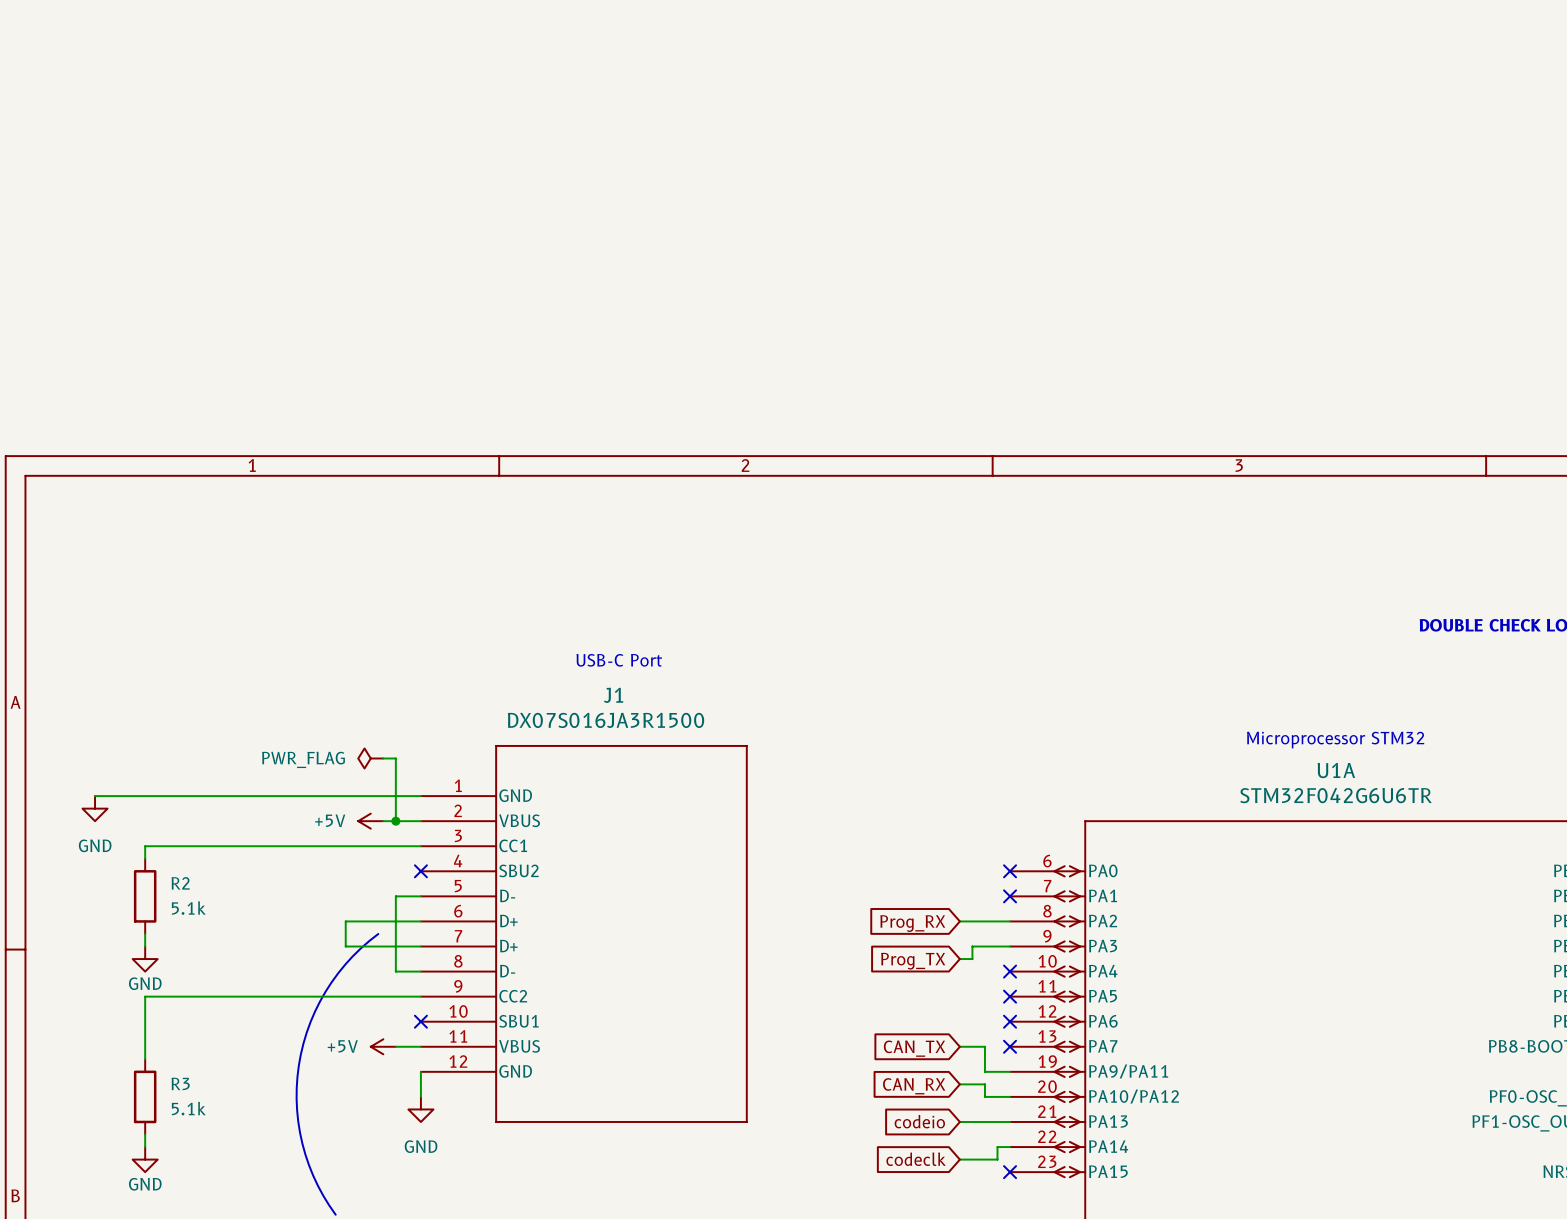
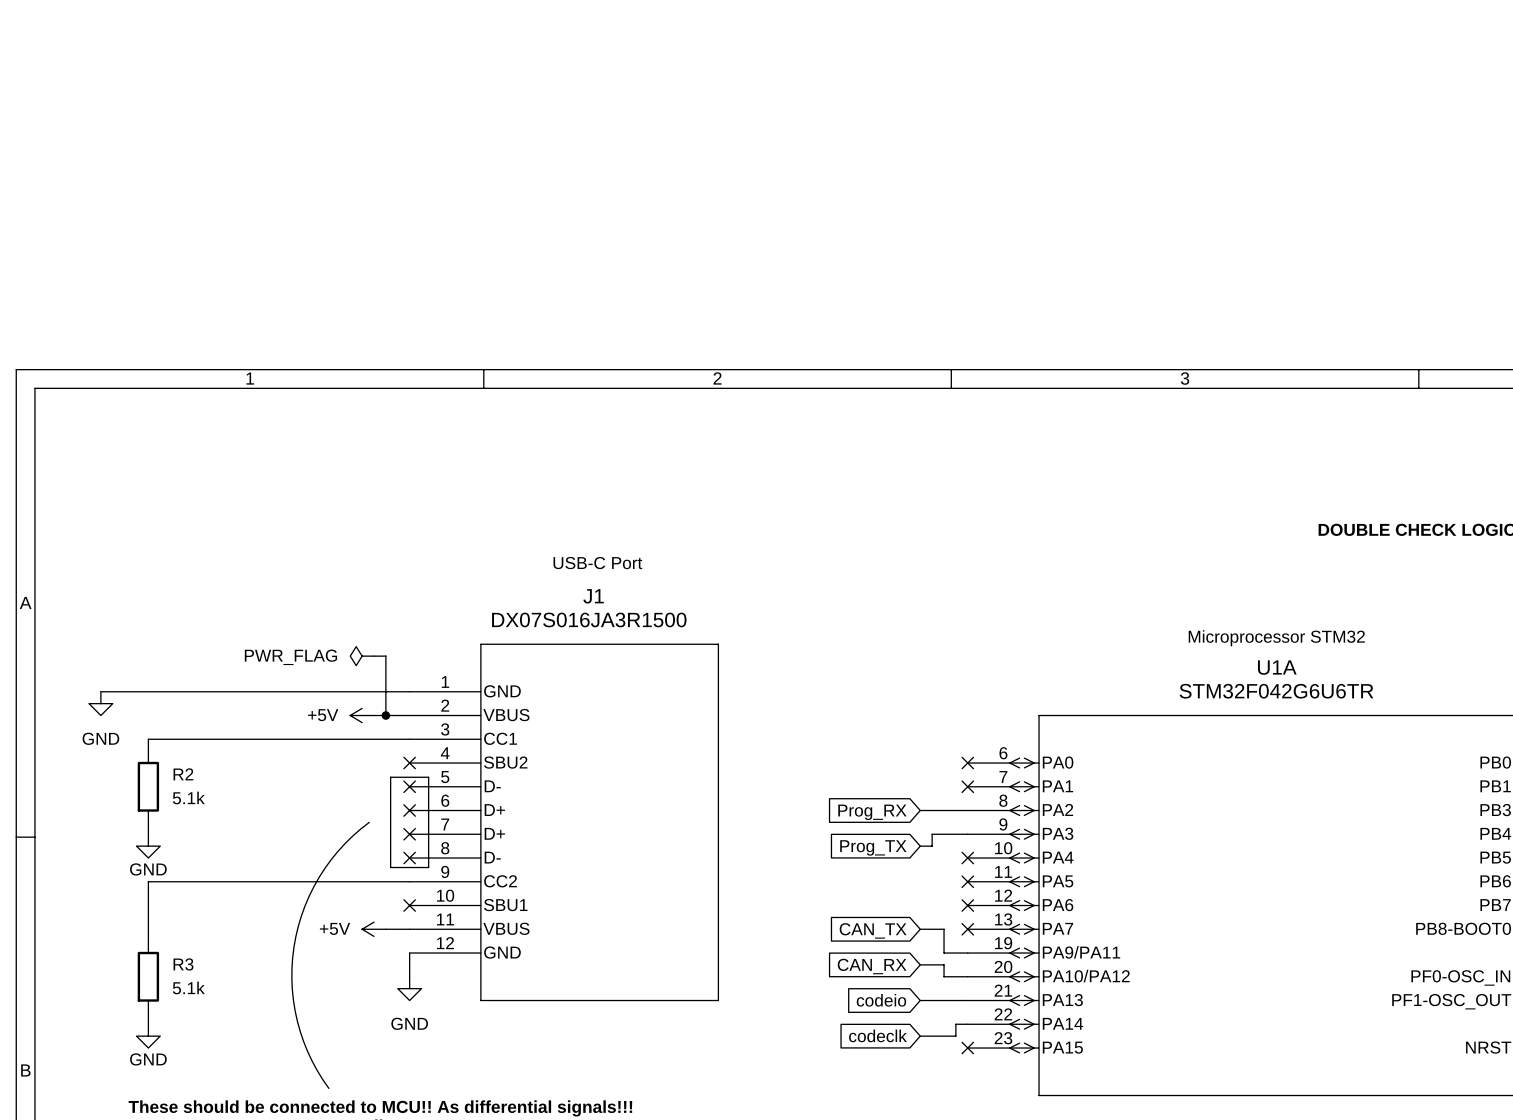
line: none -> (390, 777) (428, 777) (428, 867) (390, 867) (390, 777)
wire: (420, 896) (395, 896) (395, 971) (420, 971) -> none
no-connect mark: none -> (409, 786)
wire: (420, 921) (345, 921) (345, 946) (420, 946) -> none
no-connect mark: none -> (409, 810)
no-connect mark: none -> (409, 834)
no-connect mark: none -> (409, 858)

